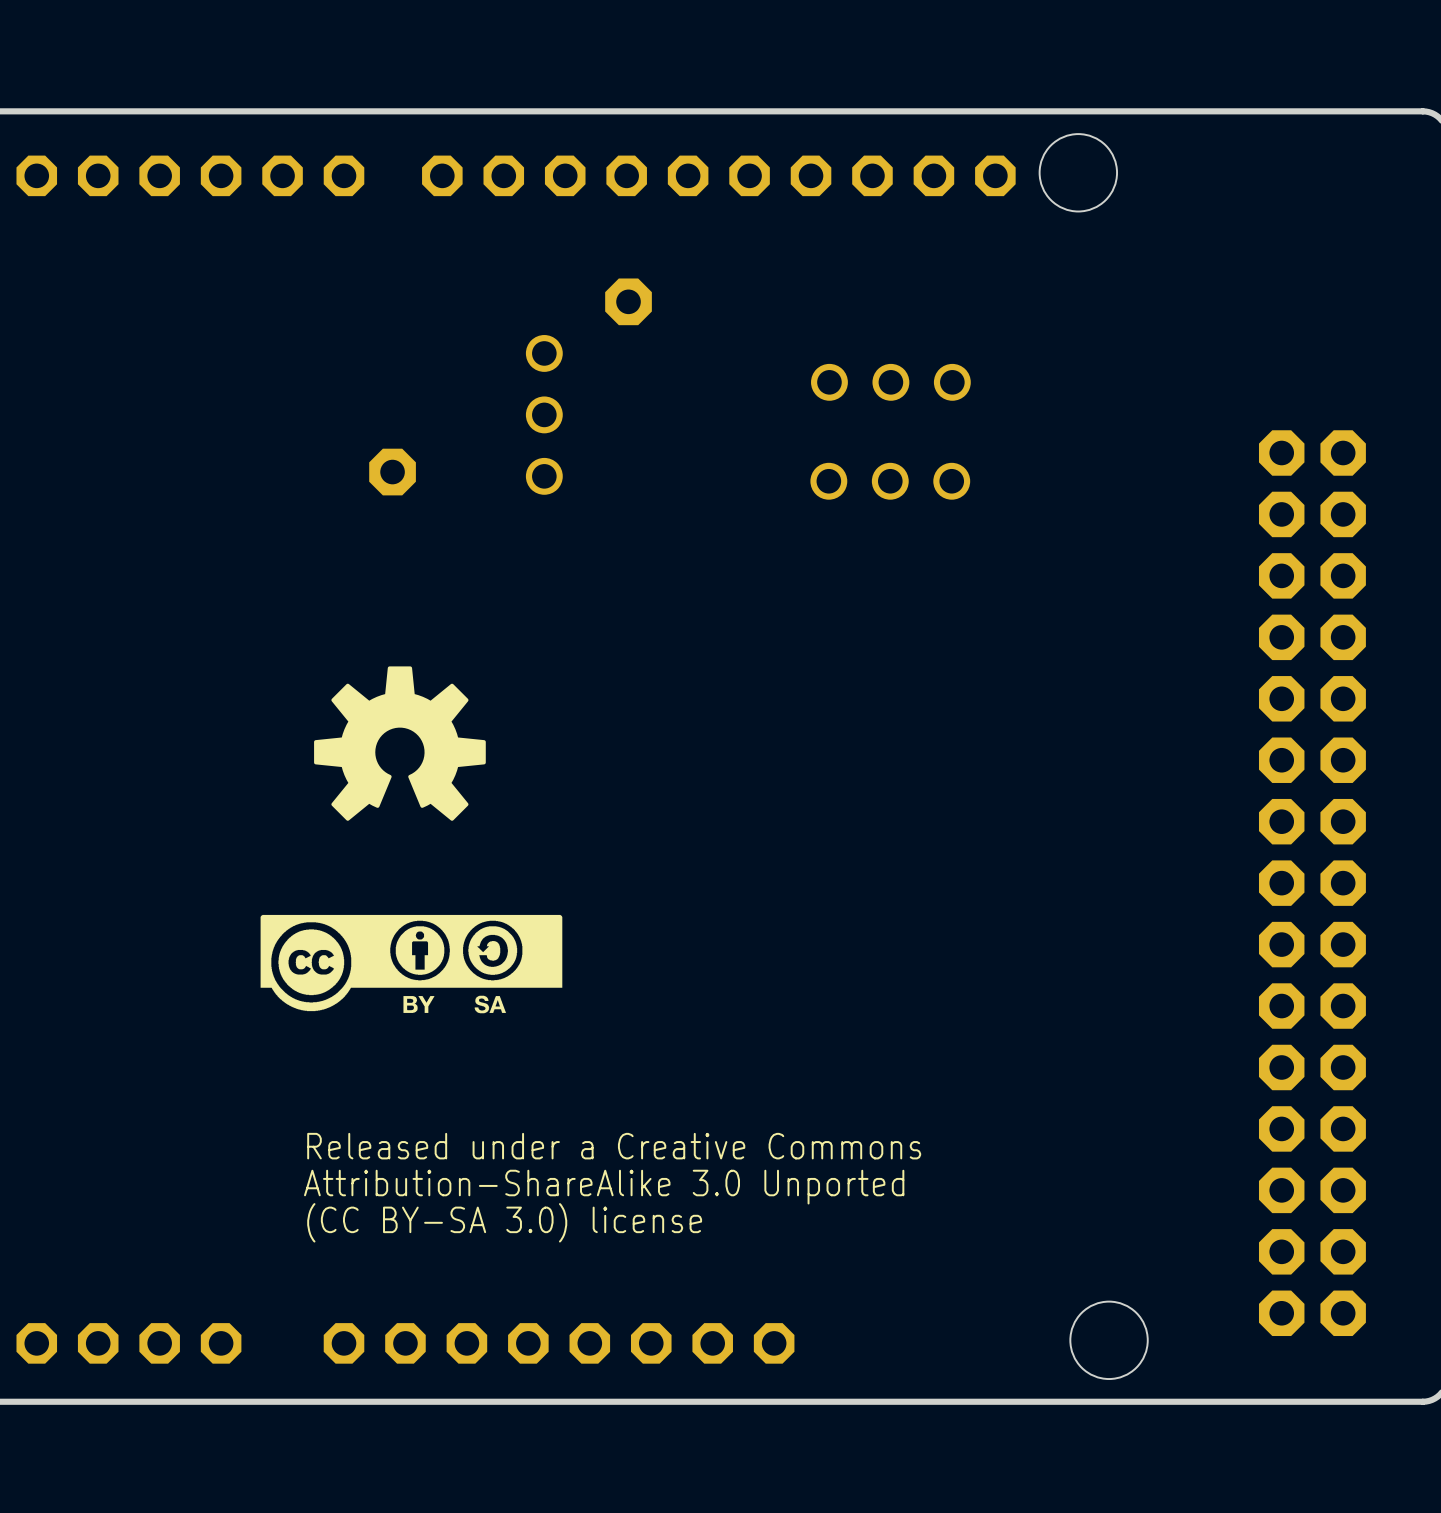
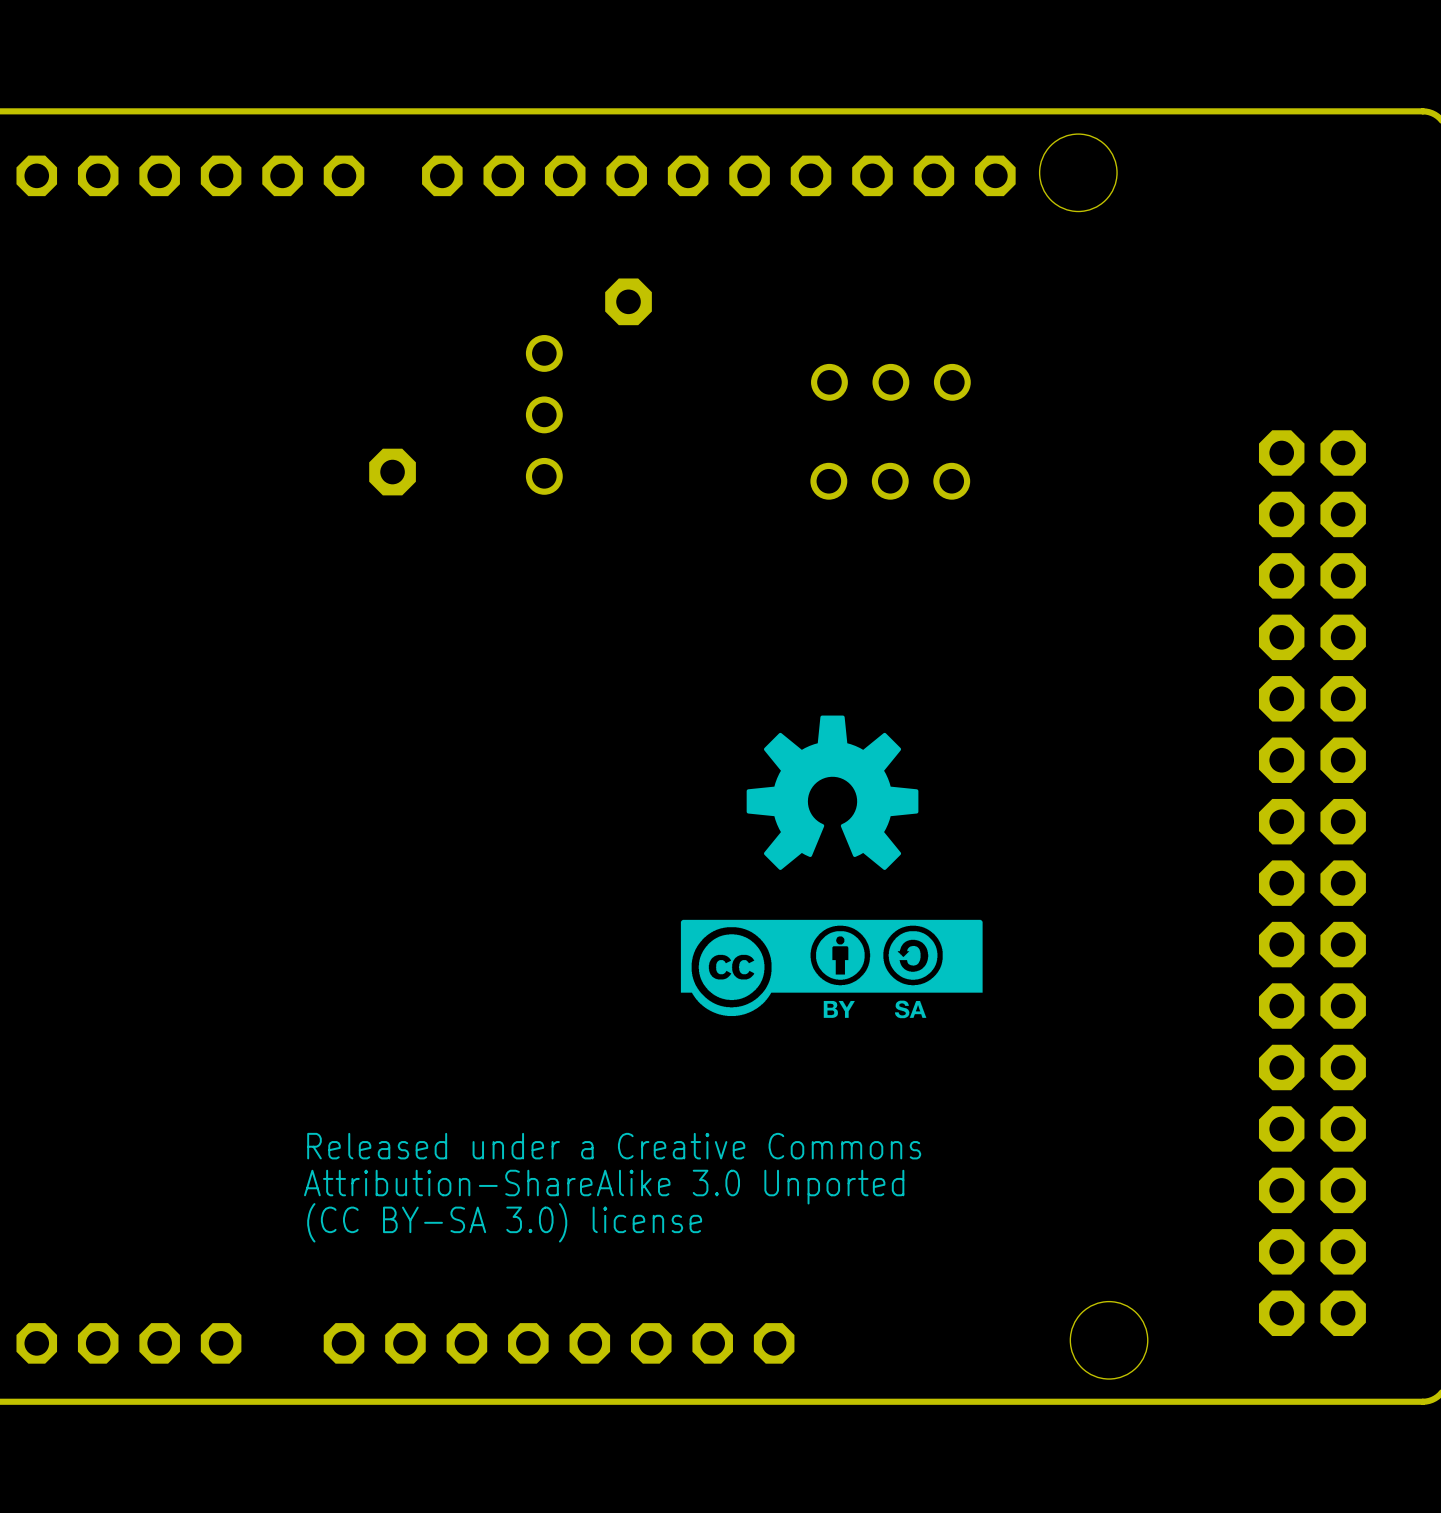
drawing position: (399, 743) -> (832, 792)
drawing position: (411, 964) -> (831, 969)

